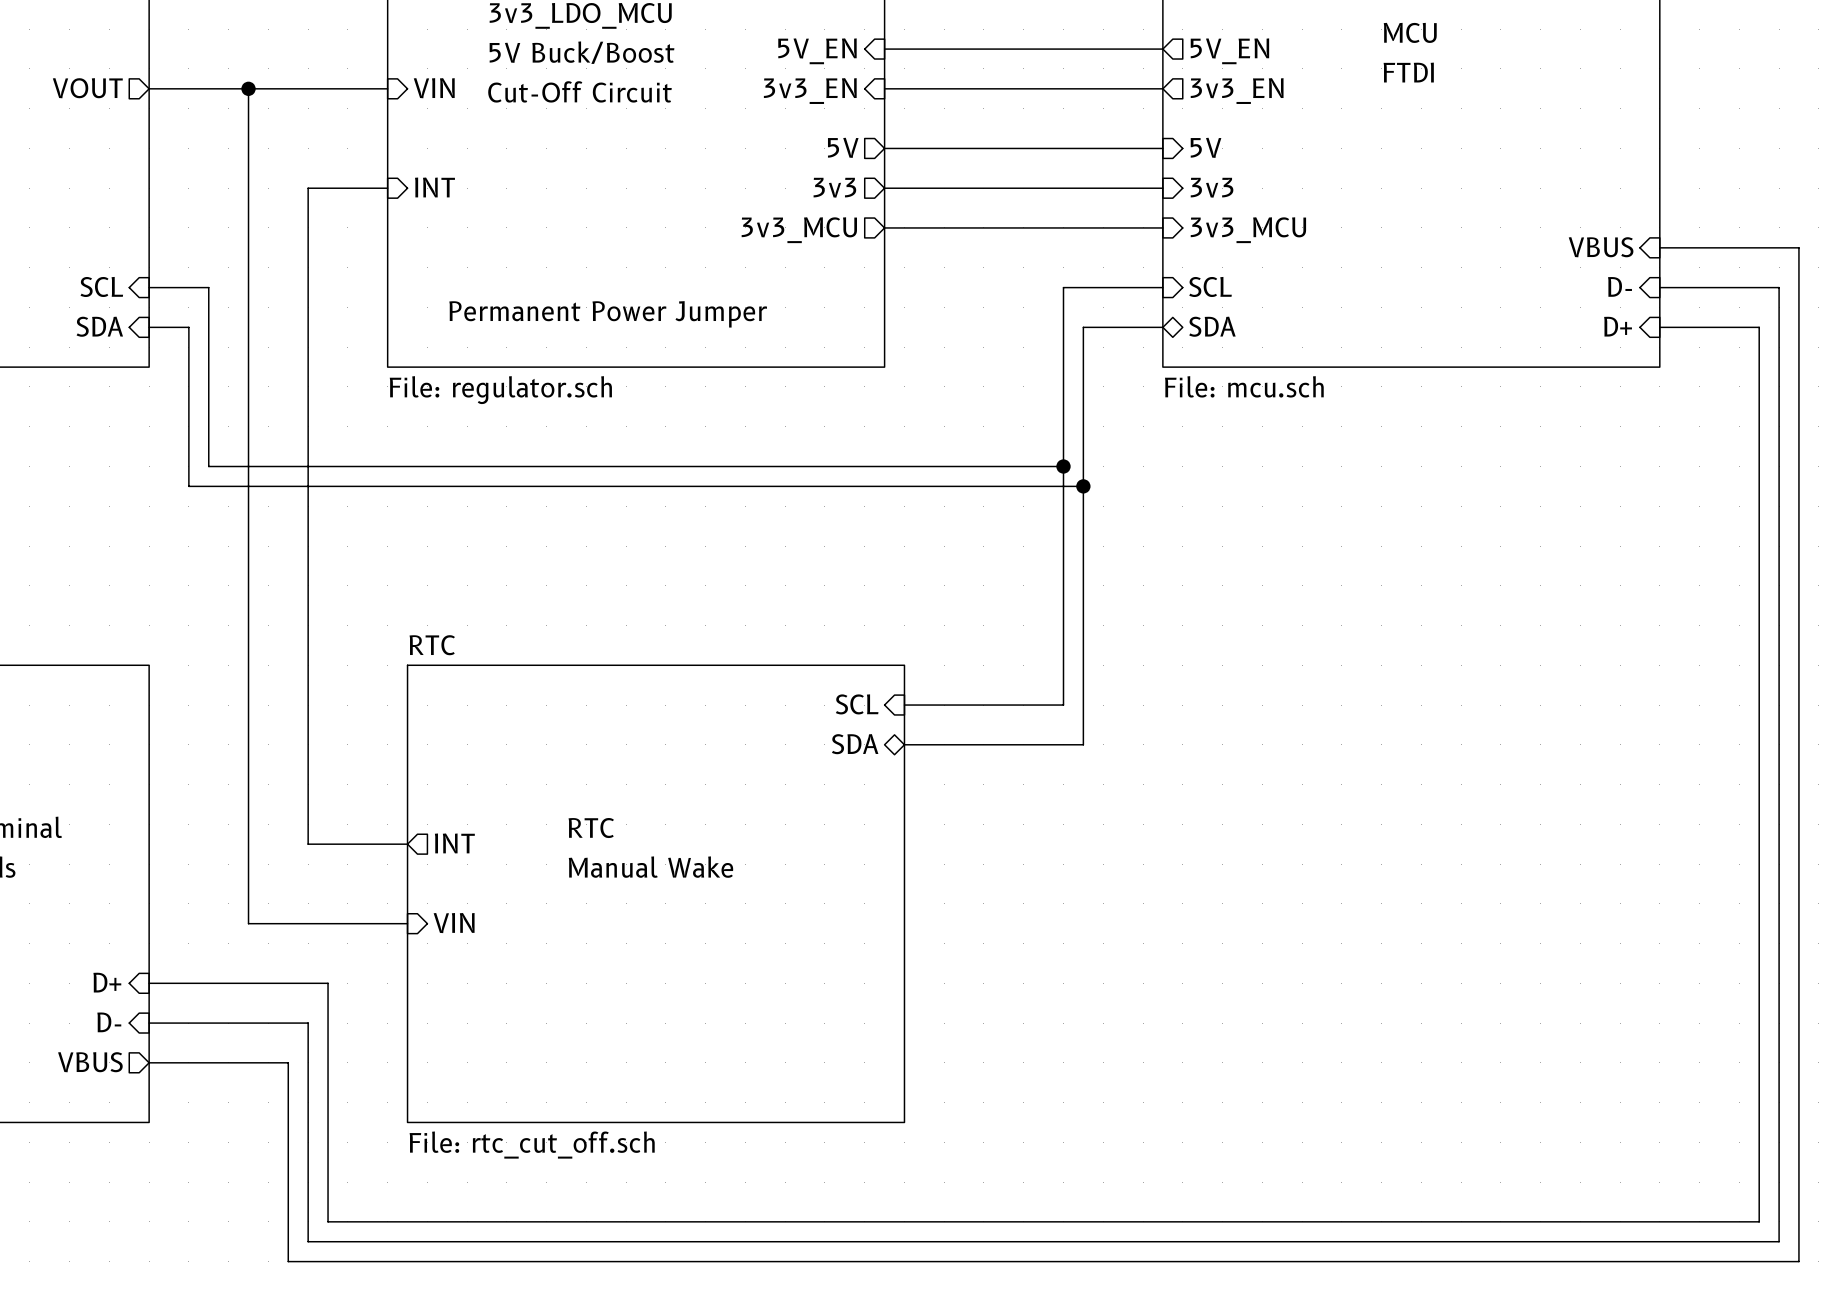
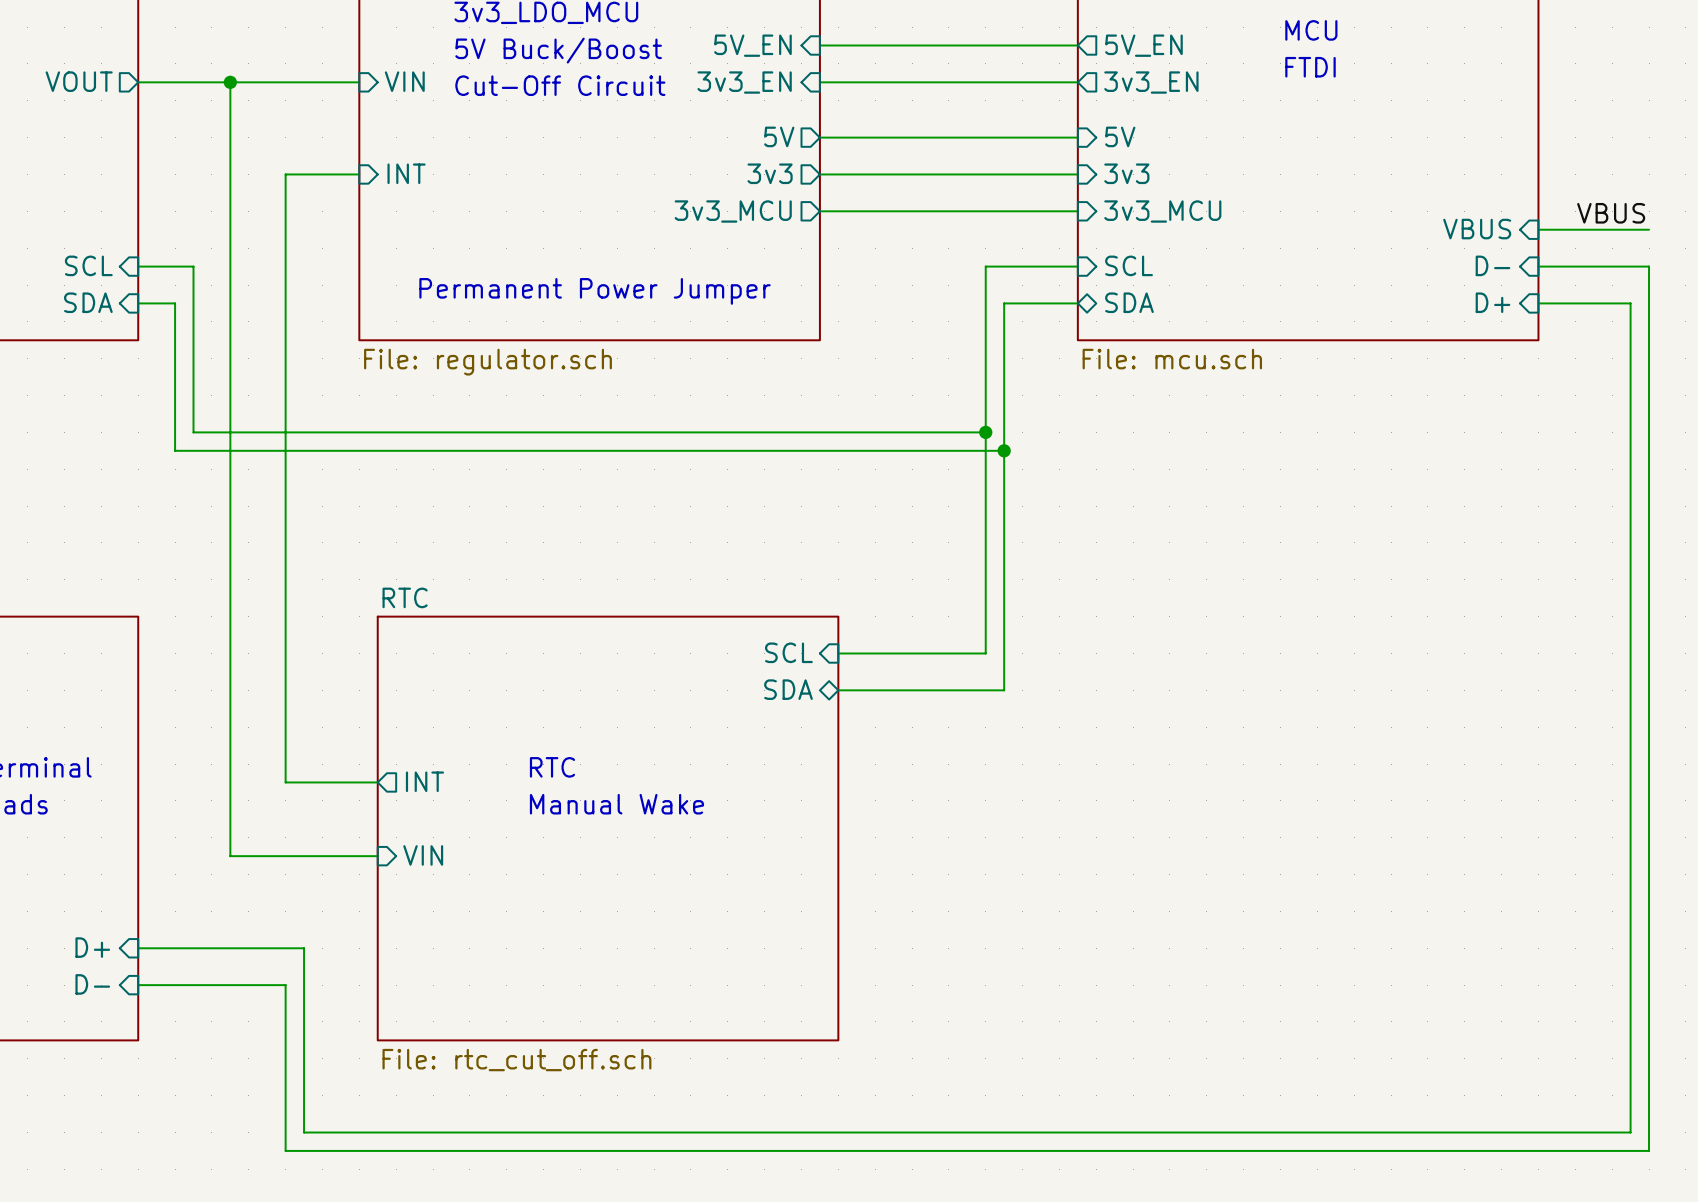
label: none -> VBUS (1611, 213)
wire: (1779, 247) (1798, 247) (1798, 1261) (288, 1261) (288, 1062) -> none
sheet pin: D+ (107, 982) -> none
wire: (149, 983) (328, 983) (328, 1023) -> (285, 948) (304, 948)
sheet pin: D- (109, 1022) -> D+ (92, 947)
wire: (308, 1023) (308, 1062) -> (267, 985) (285, 985)
sheet pin shape: output (90, 1062) -> input (92, 984)
sheet pin: VBUS (90, 1062) -> D- (92, 984)

